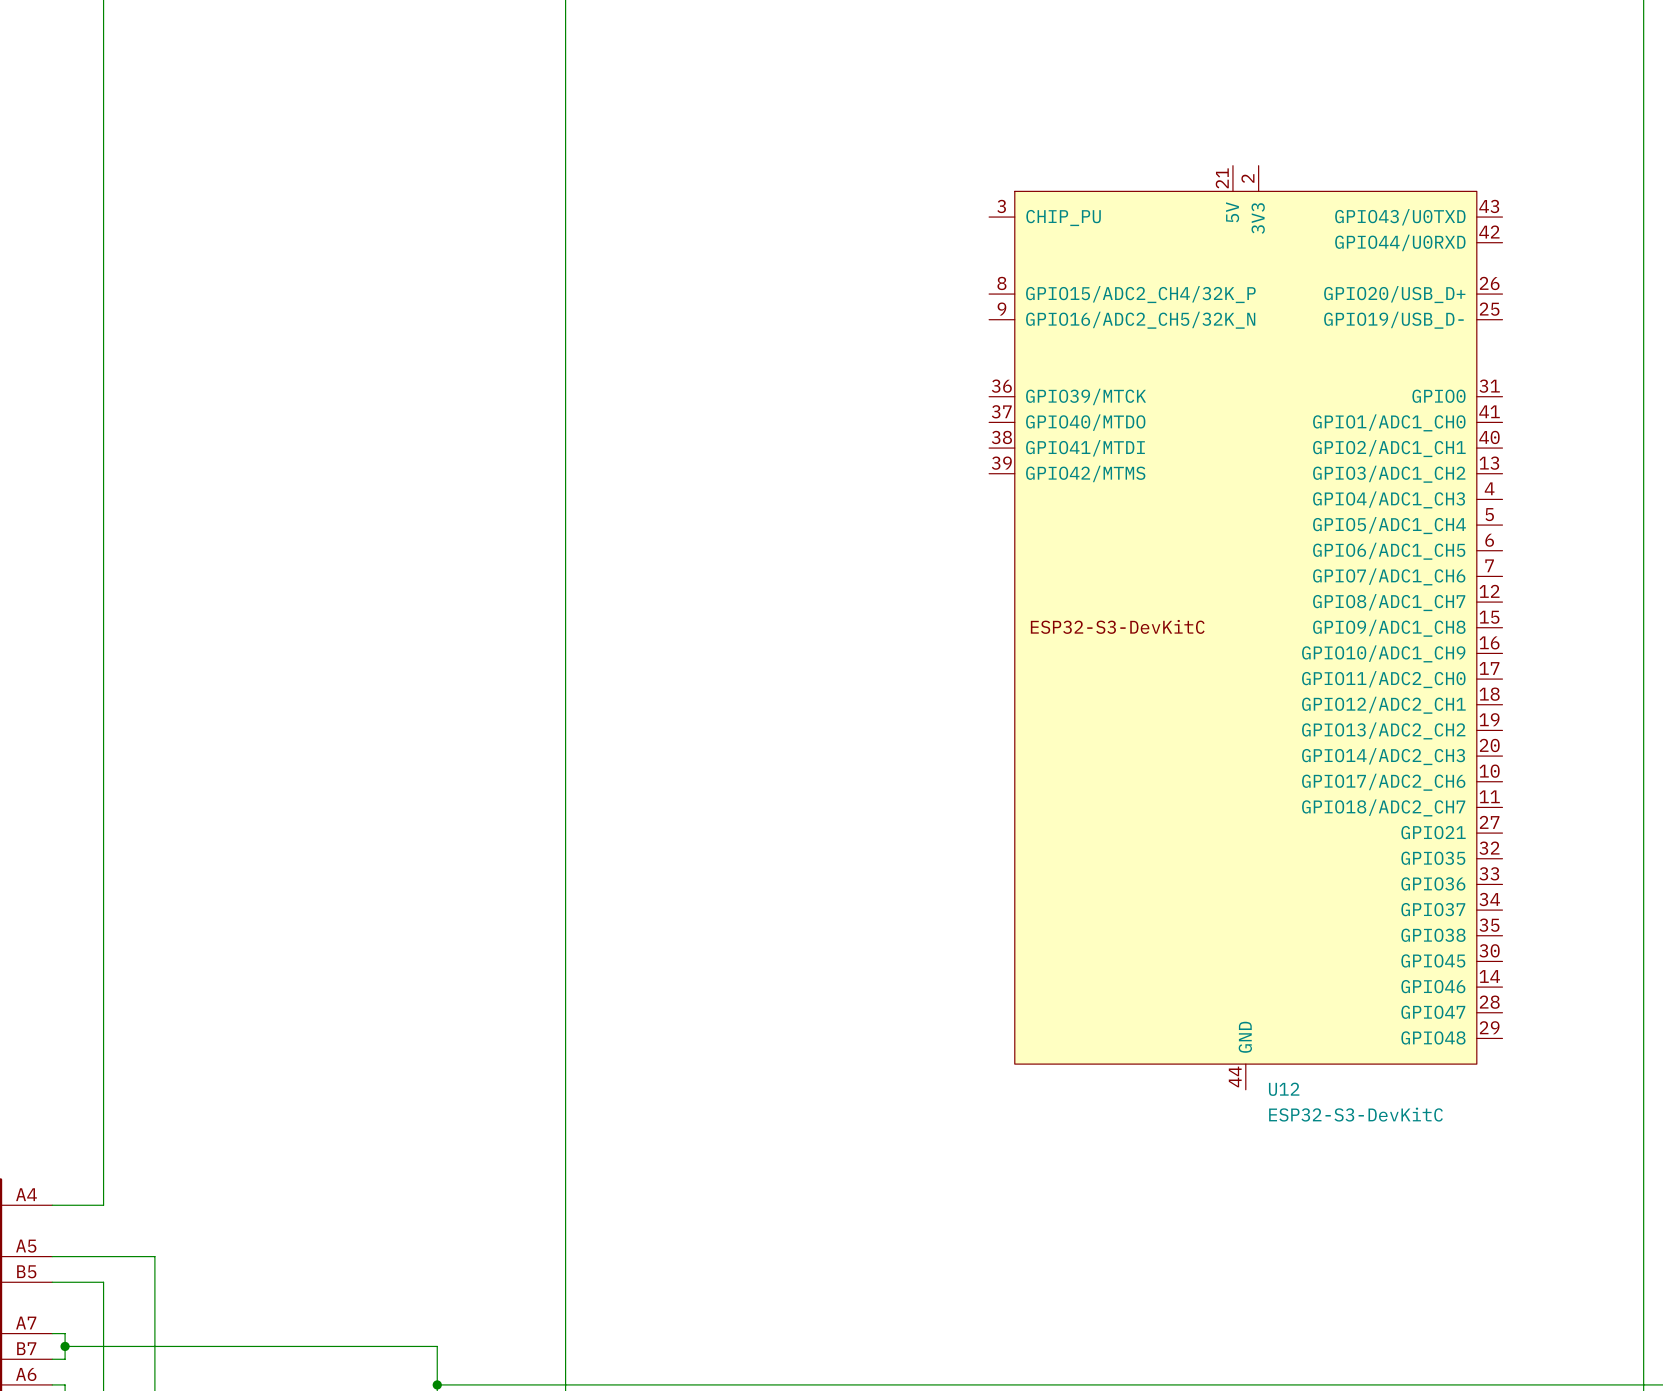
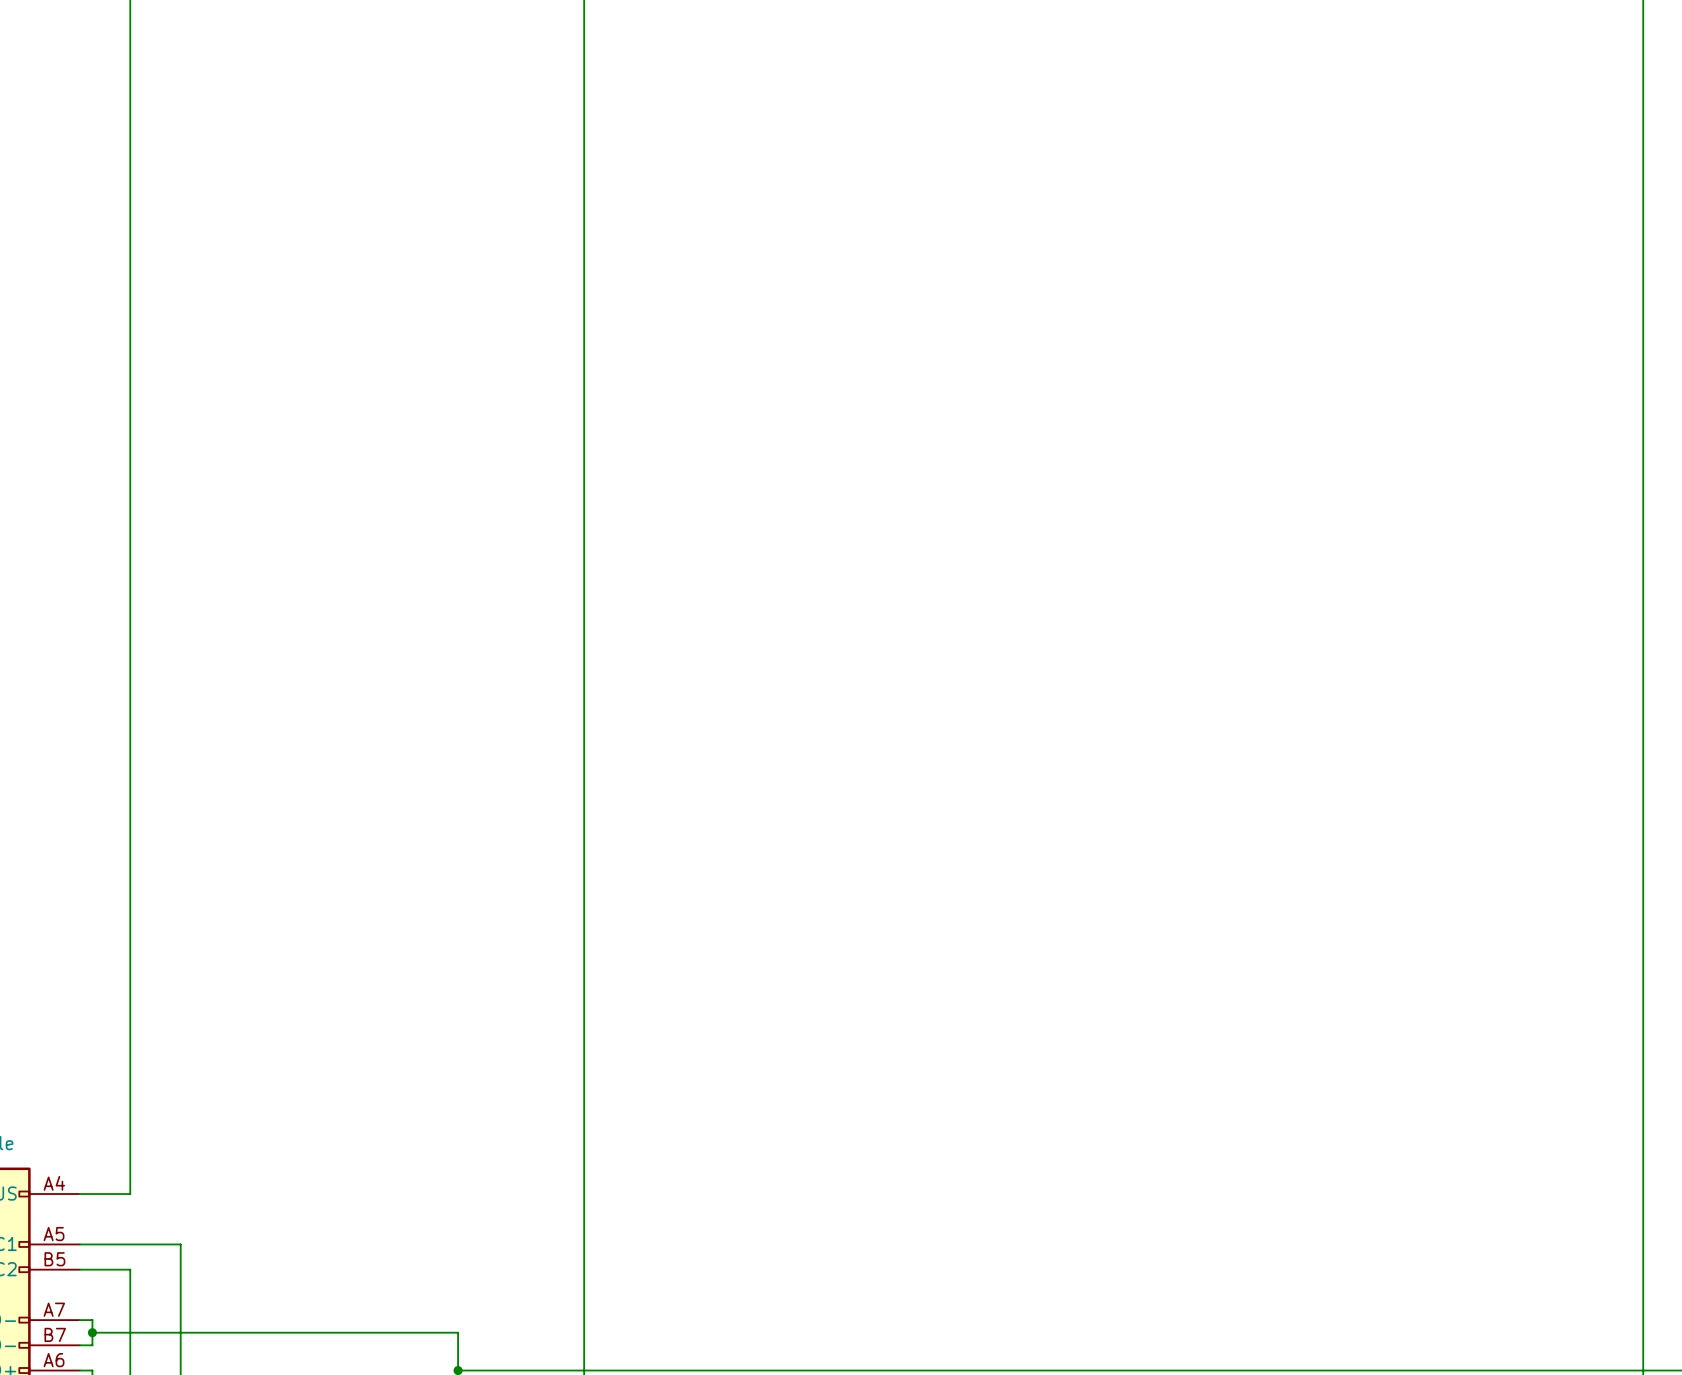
U12: ESP32-S3-DevKitC (1245, 627) -> none

